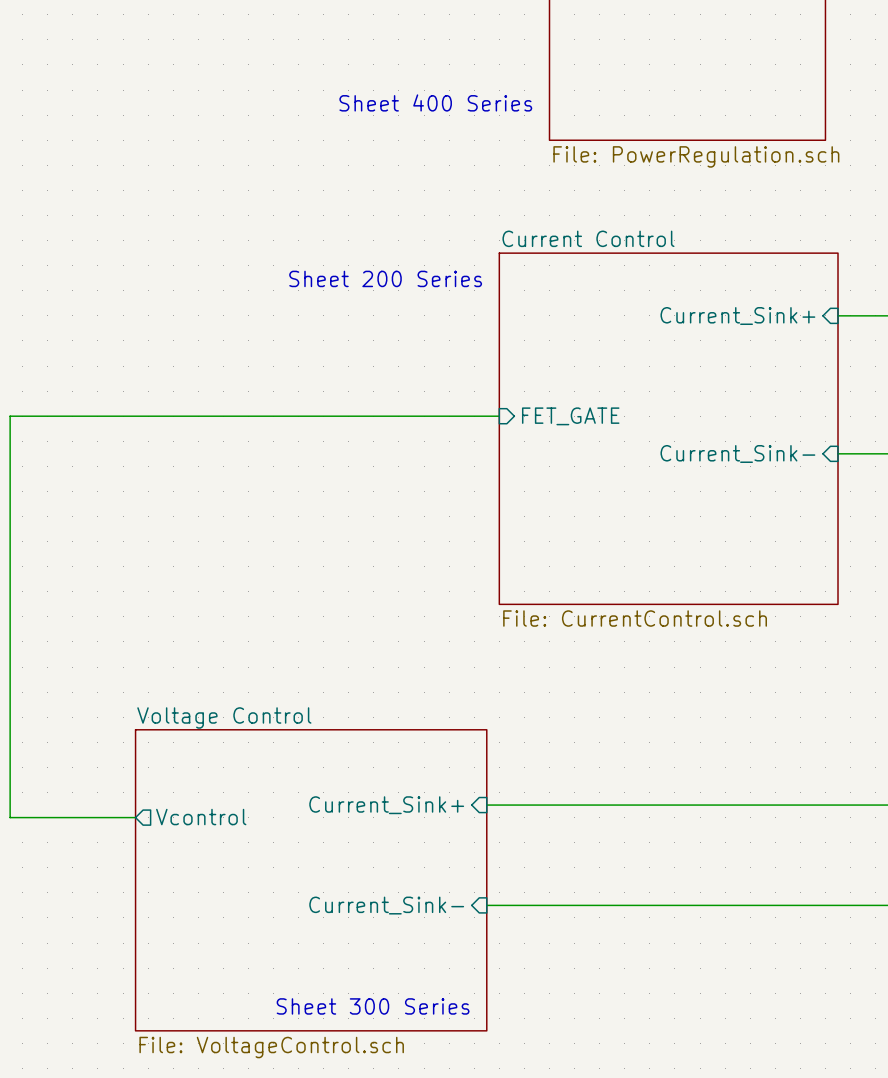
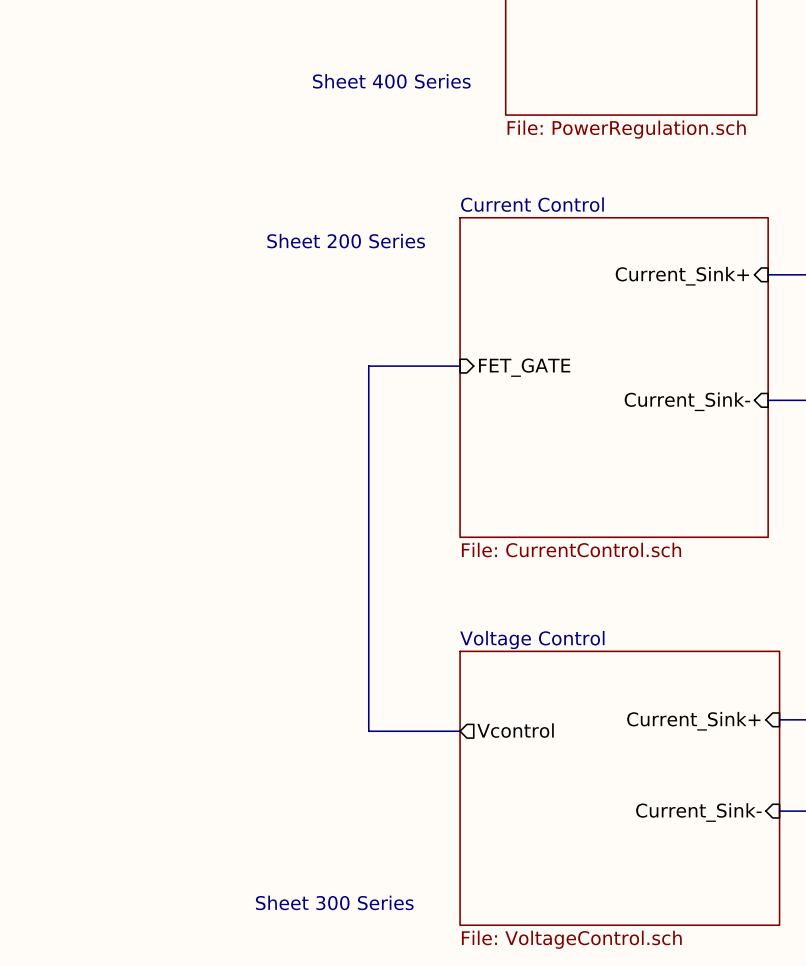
wire: (398, 416) (10, 416) (10, 817) (135, 817) -> (368, 366) (368, 731) (460, 731)
sheet pin: Current_Sink+ (386, 805) -> none
wire: (486, 805) (850, 805) -> none
sheet pin: none -> Current_Sink+ (693, 721)
sheet pin: Vcontrol (201, 817) -> none
sheet pin: none -> Vcontrol (515, 730)
sheet Voltage Control: File: VoltageControl.sch (311, 880) -> none
sheet Voltage Control: none -> File: VoltageControl.sch (619, 788)
sheet pin: Current_Sink- (386, 905) -> none
wire: (486, 905) (850, 905) -> none
sheet pin: none -> Current_Sink- (698, 812)

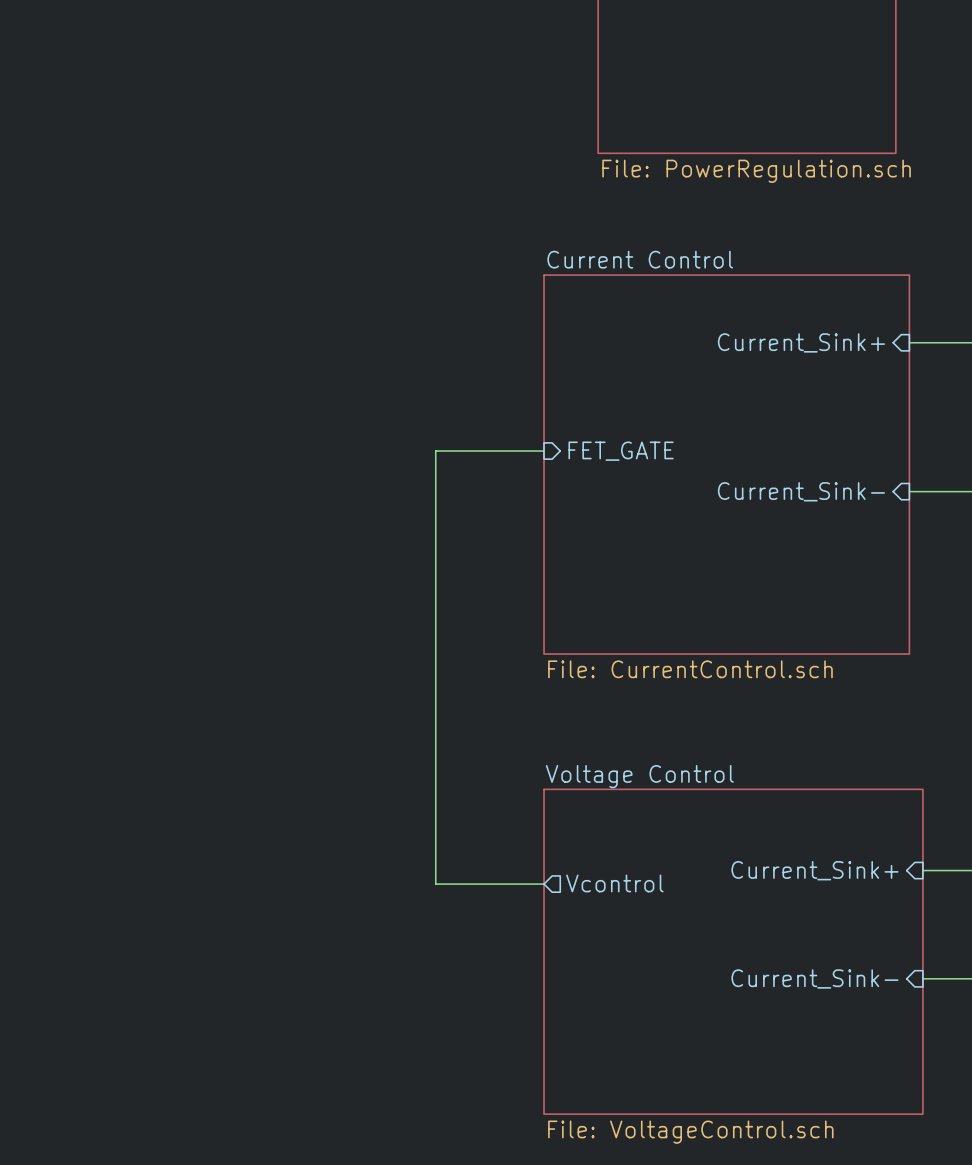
text: Sheet 400 Series (391, 81) -> none
text: Sheet 200 Series (346, 241) -> none
text: Sheet 300 Series (334, 902) -> none

